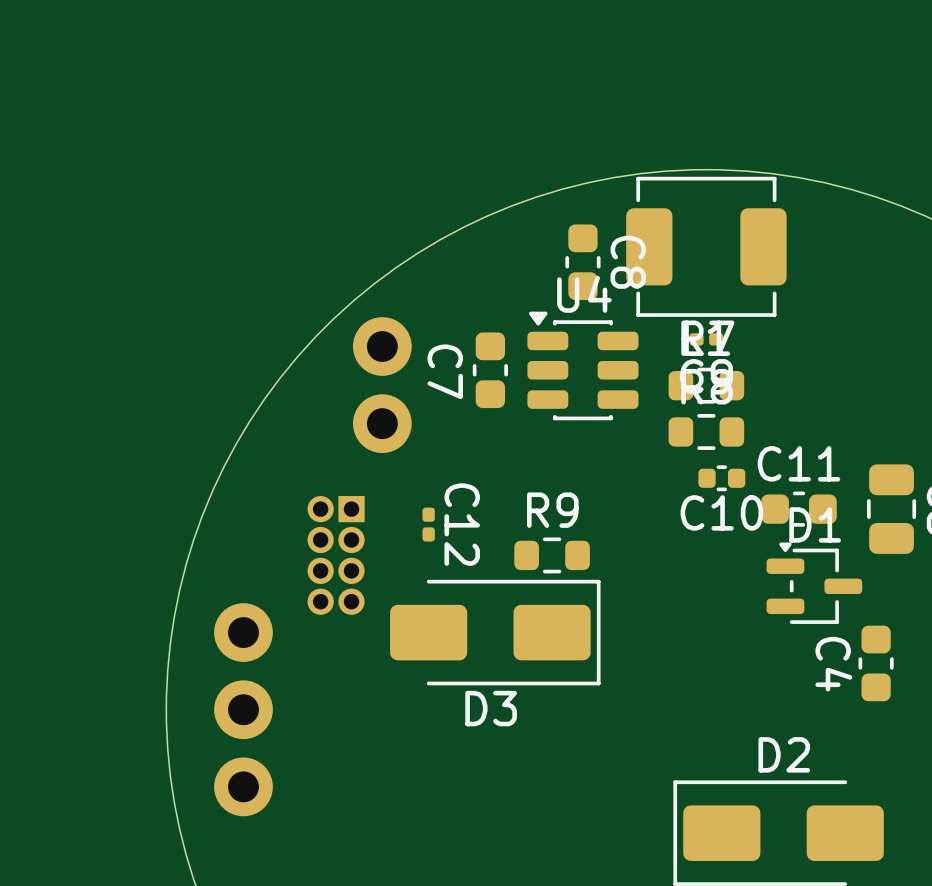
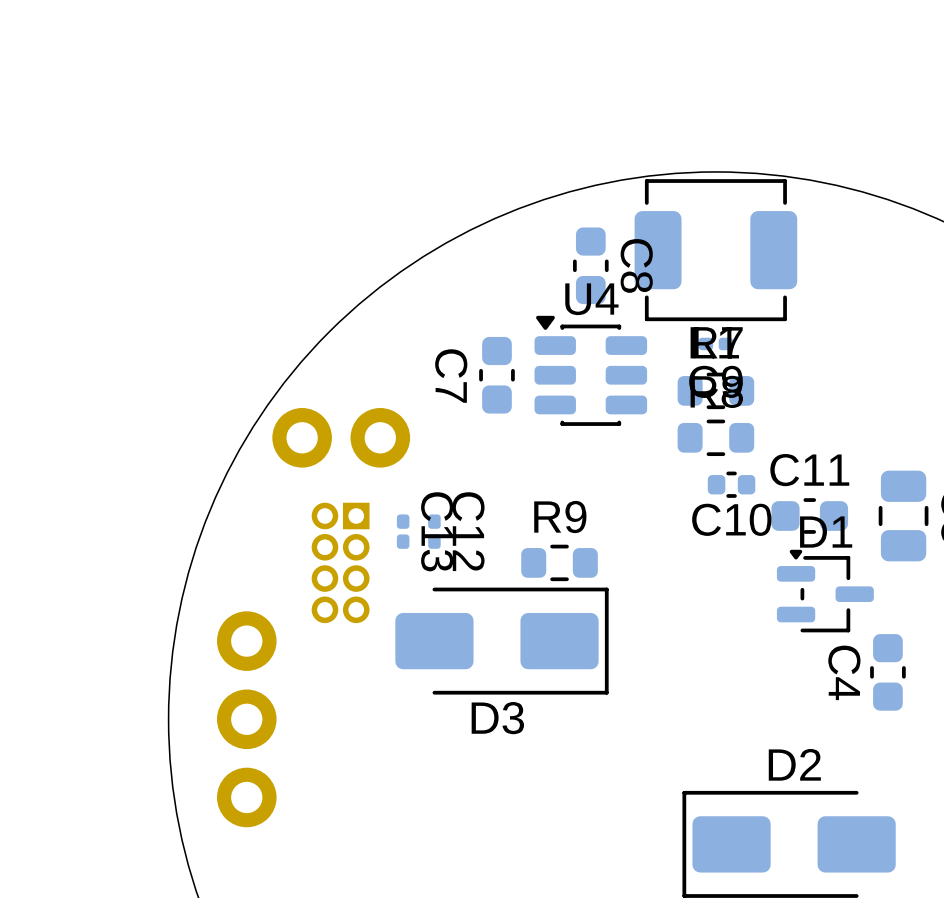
part rotation: 0° (382, 385) -> 90° clockwise (341, 437)
C13: none -> (403, 531)

